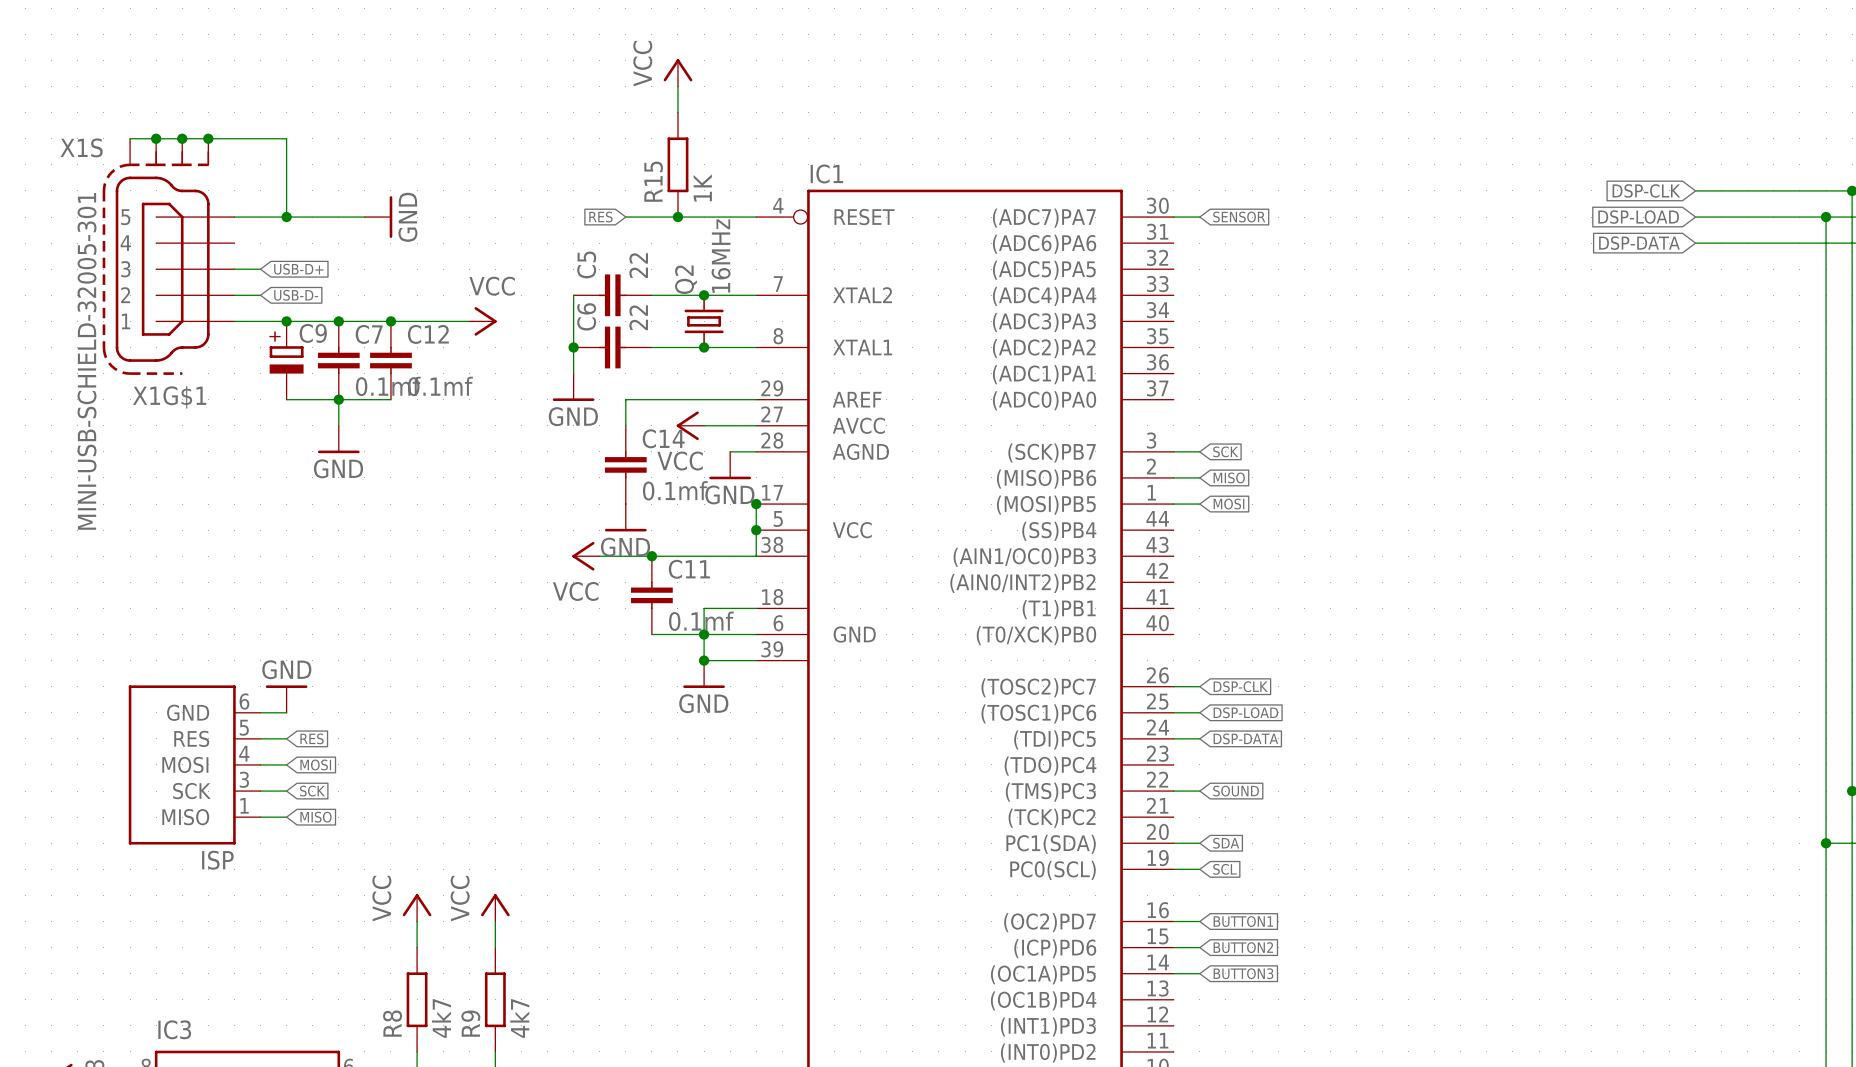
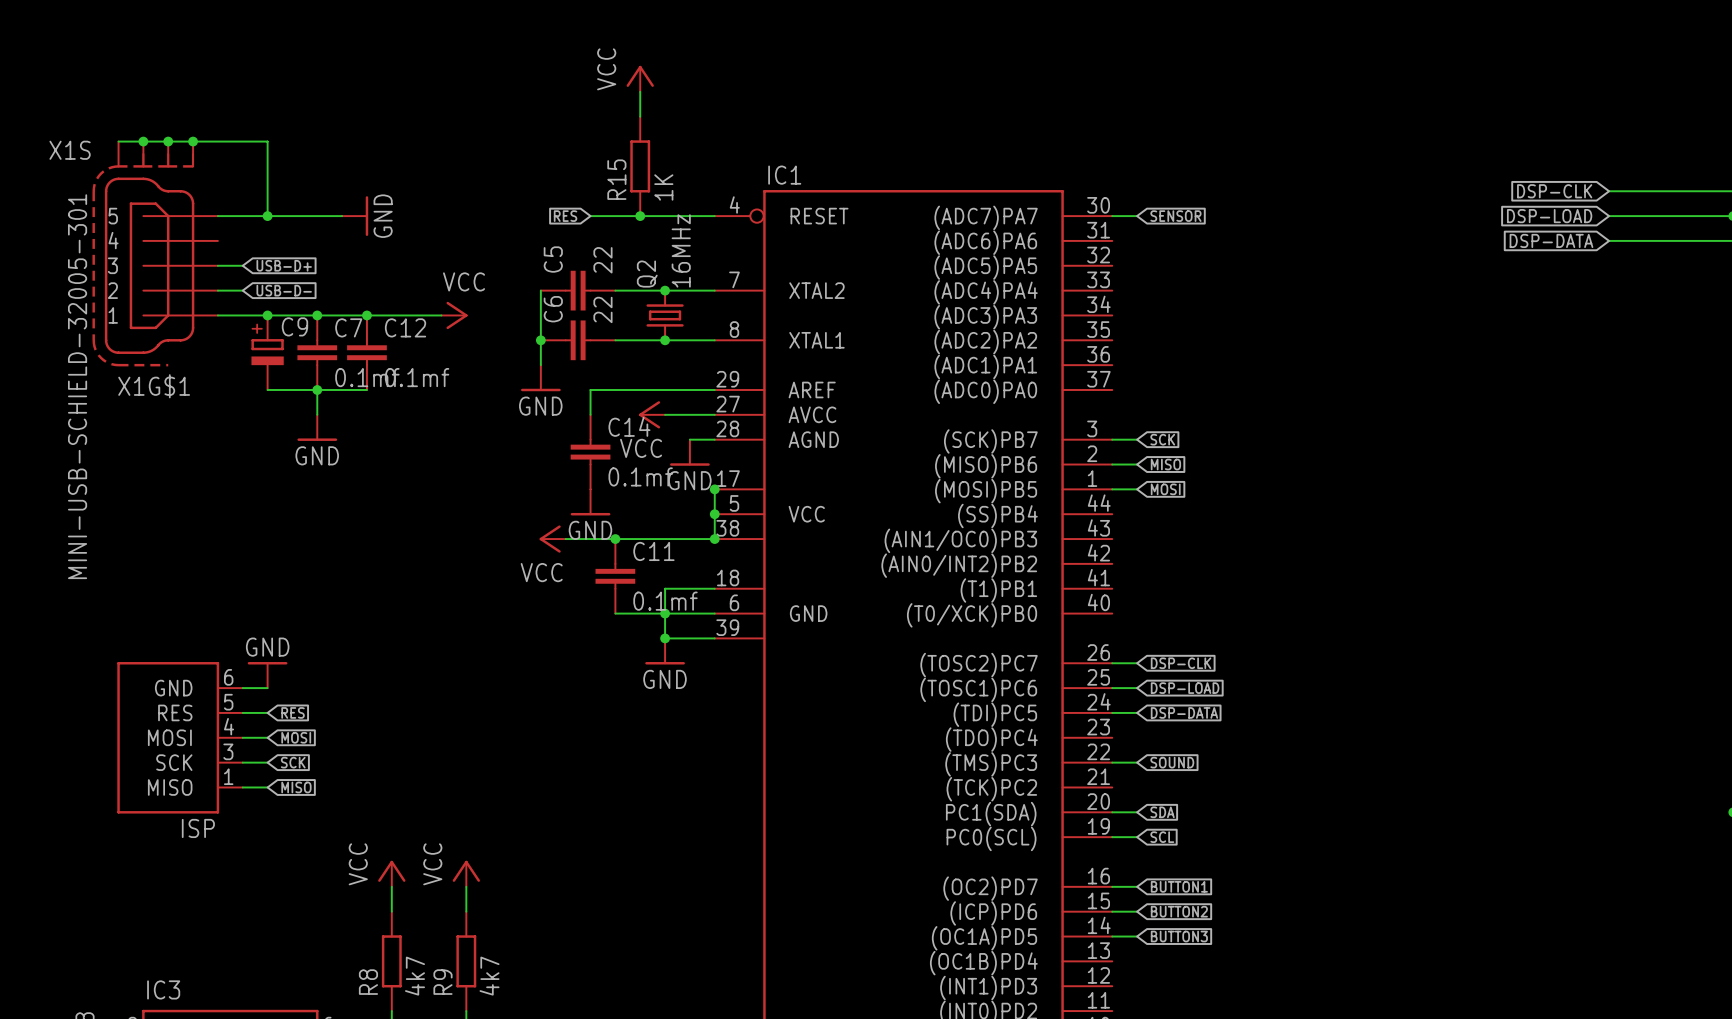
junction: none -> (714, 539)

